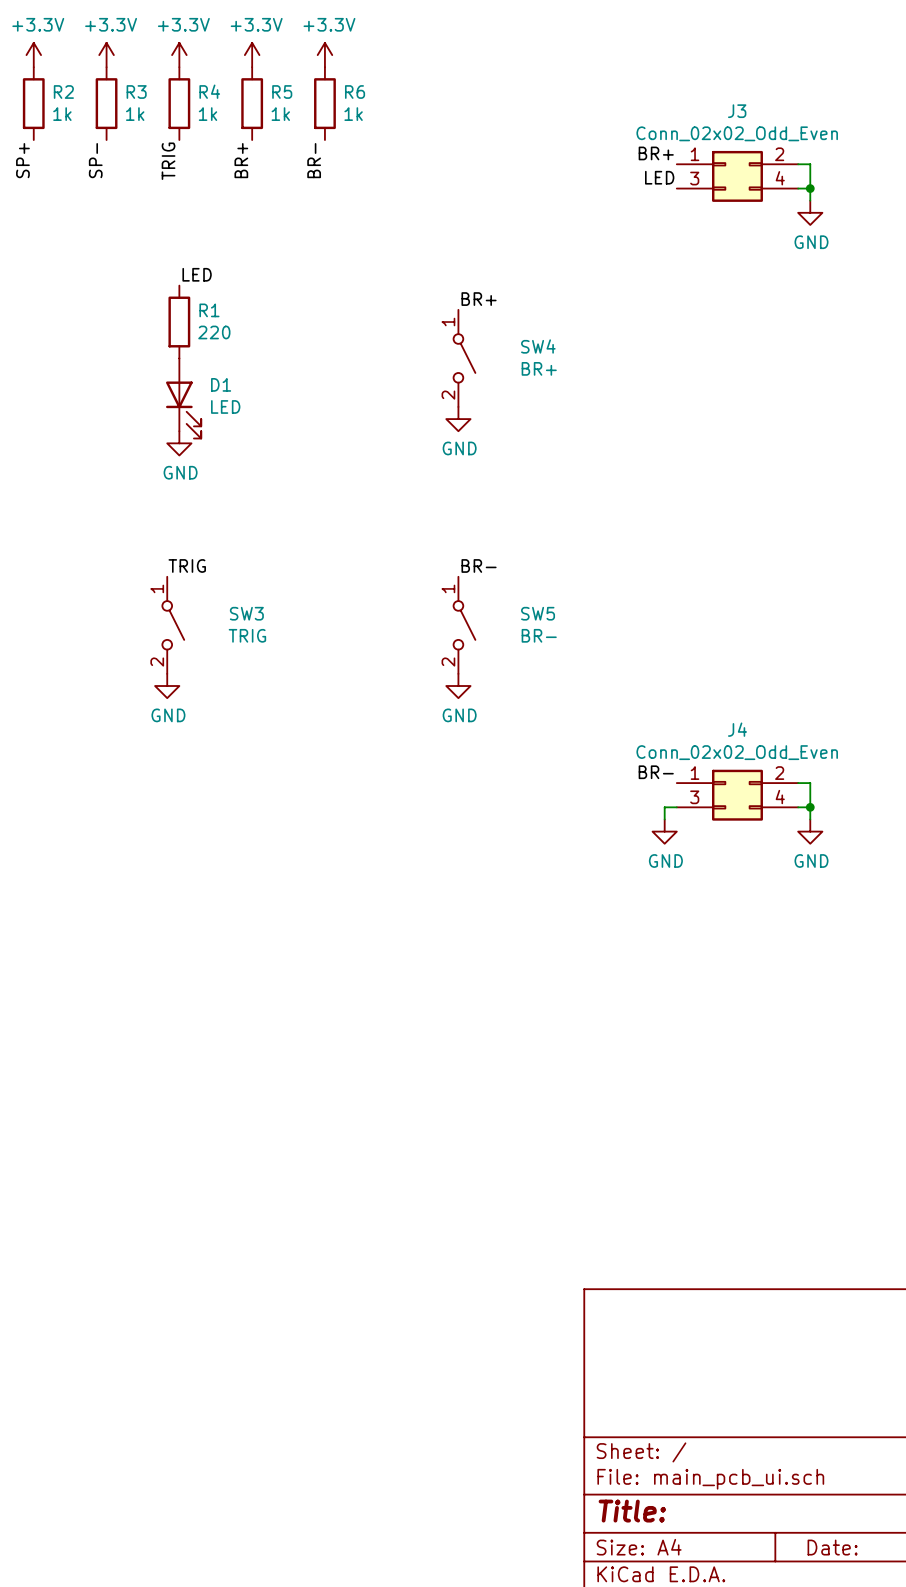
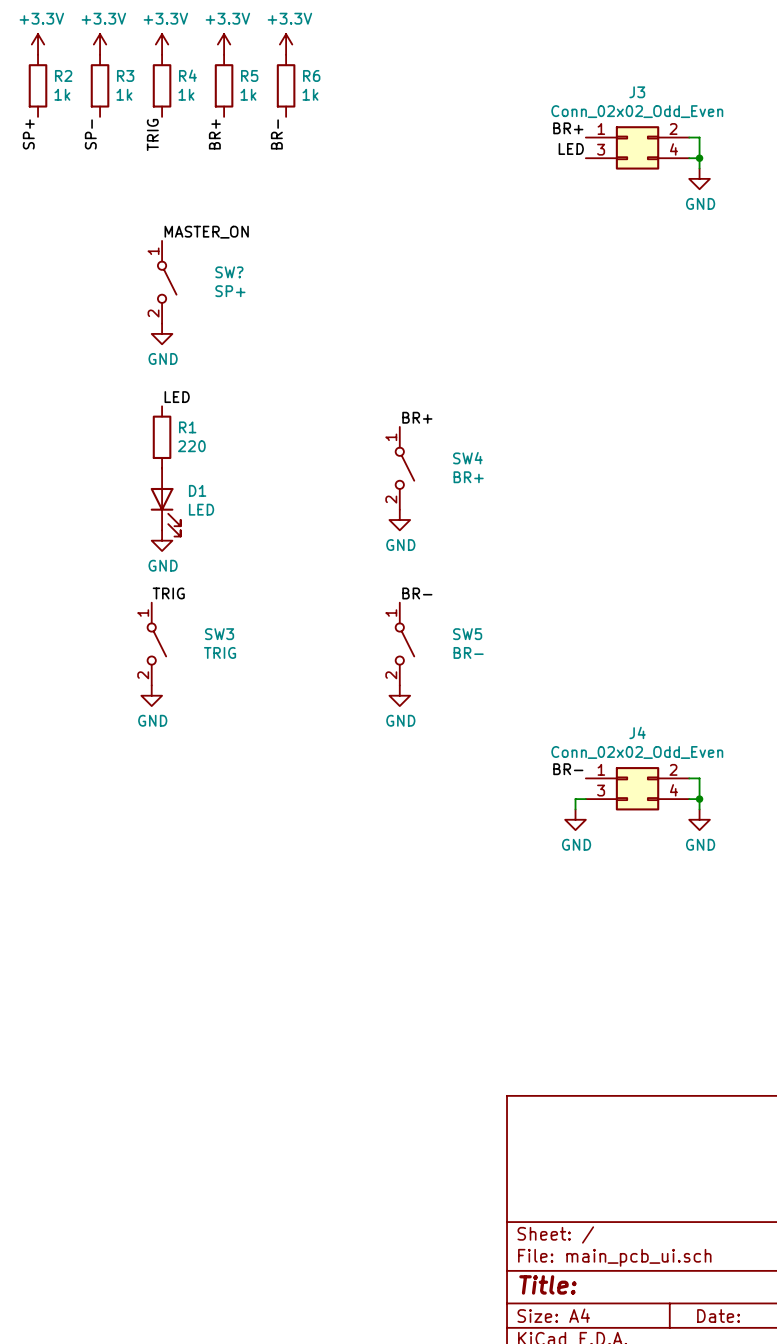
label: LED (197, 274) -> MASTER_ON (206, 232)
label position: BR+ (479, 299) -> BR+ (417, 417)
R1 position: (179, 322) -> (162, 437)
SW?: none -> SP+ (167, 282)
SW4 position: (464, 358) -> (404, 468)
D1 position: (183, 398) -> (165, 502)
power symbol: GND (458, 419) -> none
power symbol position: GND (179, 443) -> GND (162, 333)
label: none -> LED (177, 397)
label position: TRIG (187, 565) -> TRIG (168, 593)
label: BR- (479, 565) -> none
power symbol: none -> GND (399, 520)
SW3 position: (173, 625) -> (156, 644)
SW5 position: (464, 625) -> (404, 644)
power symbol position: GND (167, 686) -> GND (162, 540)
power symbol: GND (458, 686) -> none
label: none -> BR- (417, 593)
label: BR- (656, 772) -> none
wire: (798, 783) (810, 783) (810, 819) -> (689, 778) (699, 778) (699, 809)
J4 position: (737, 795) -> (637, 788)
wire: (676, 807) (664, 807) (664, 819) -> (585, 799) (575, 799) (575, 809)
wire: (798, 807) (810, 807) -> (689, 799) (699, 799)
junction: (810, 807) -> none
power symbol: none -> GND (151, 695)
power symbol: none -> GND (399, 695)
power symbol: GND (664, 831) -> none
power symbol: GND (810, 831) -> none
label: none -> BR- (568, 769)
junction: none -> (699, 799)
power symbol: none -> GND (575, 819)
power symbol: none -> GND (699, 819)

